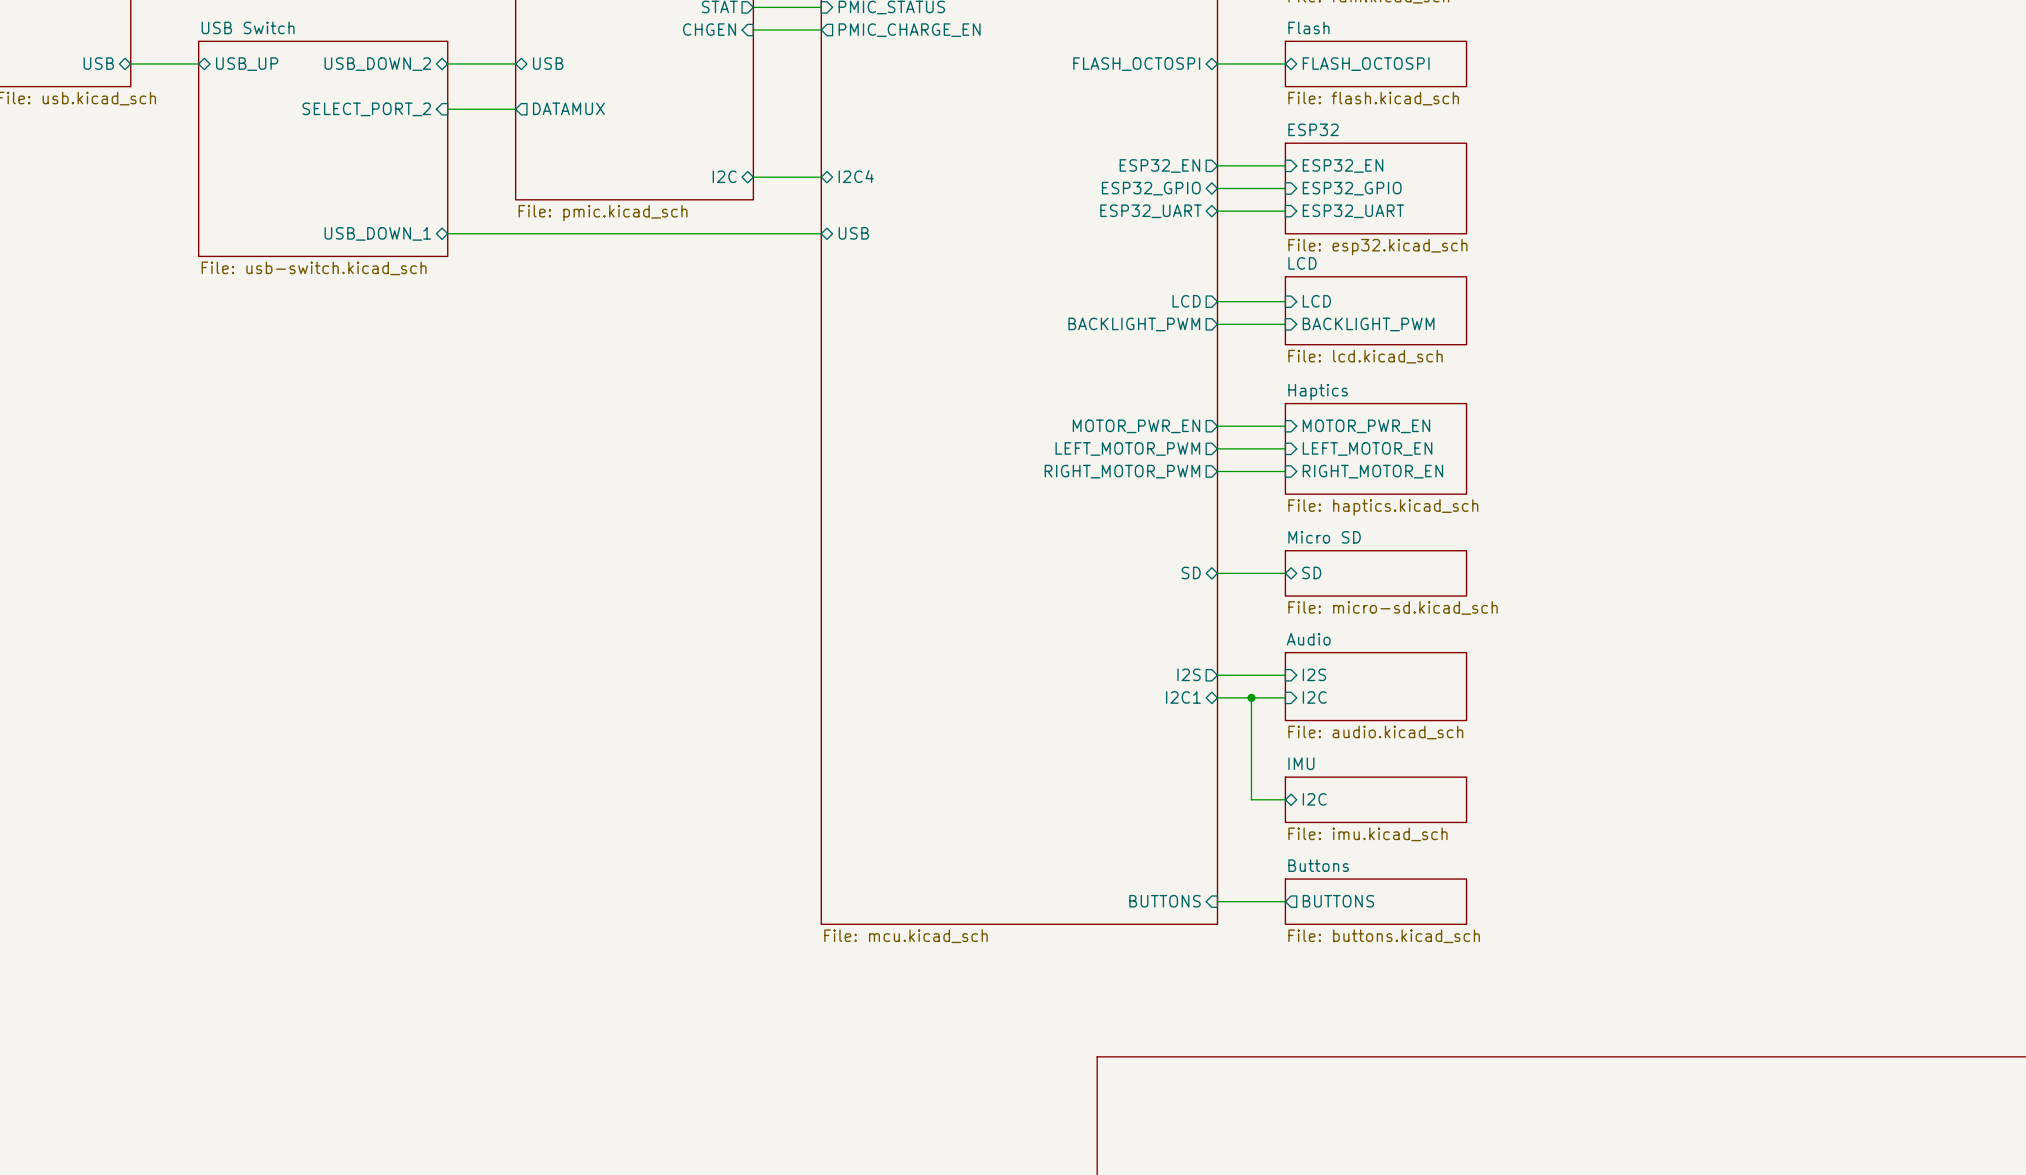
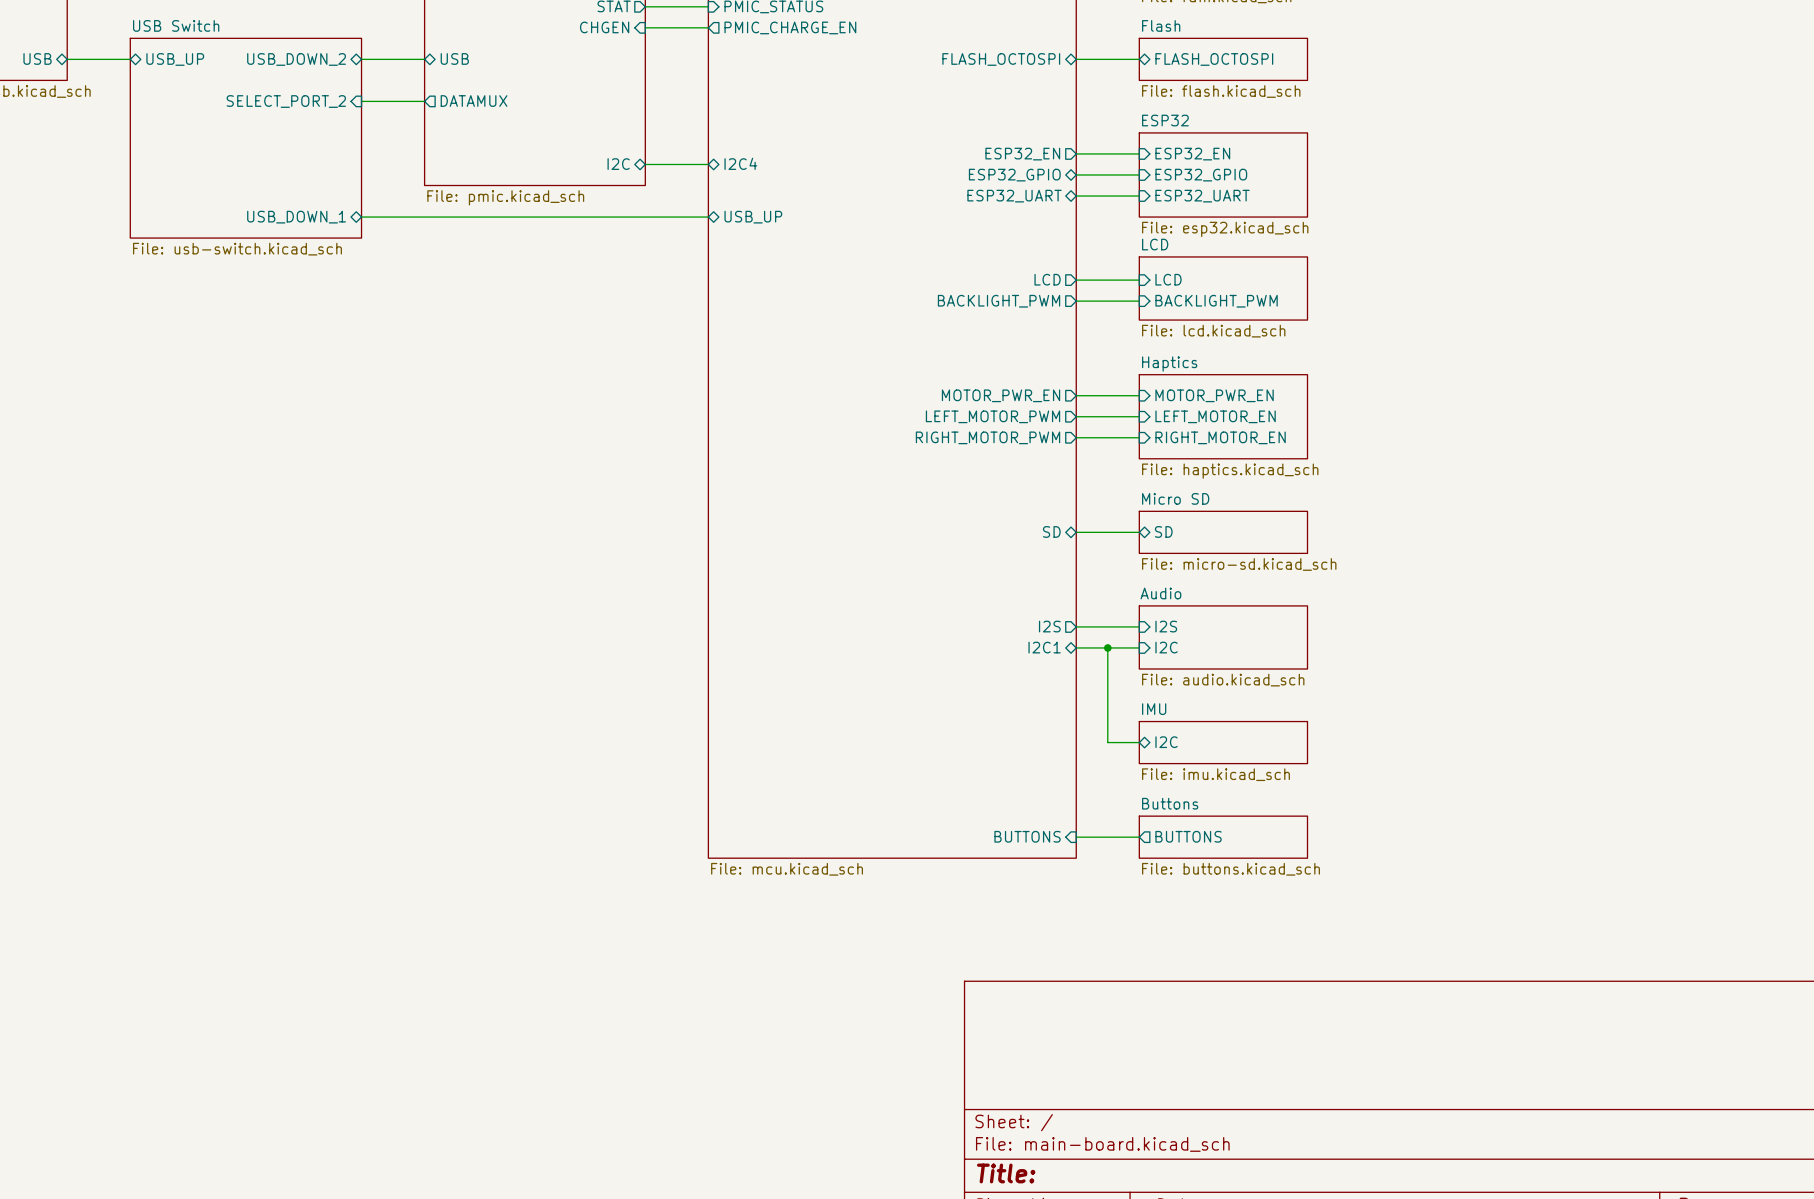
sheet pin: USB (853, 233) -> USB_UP (753, 217)

